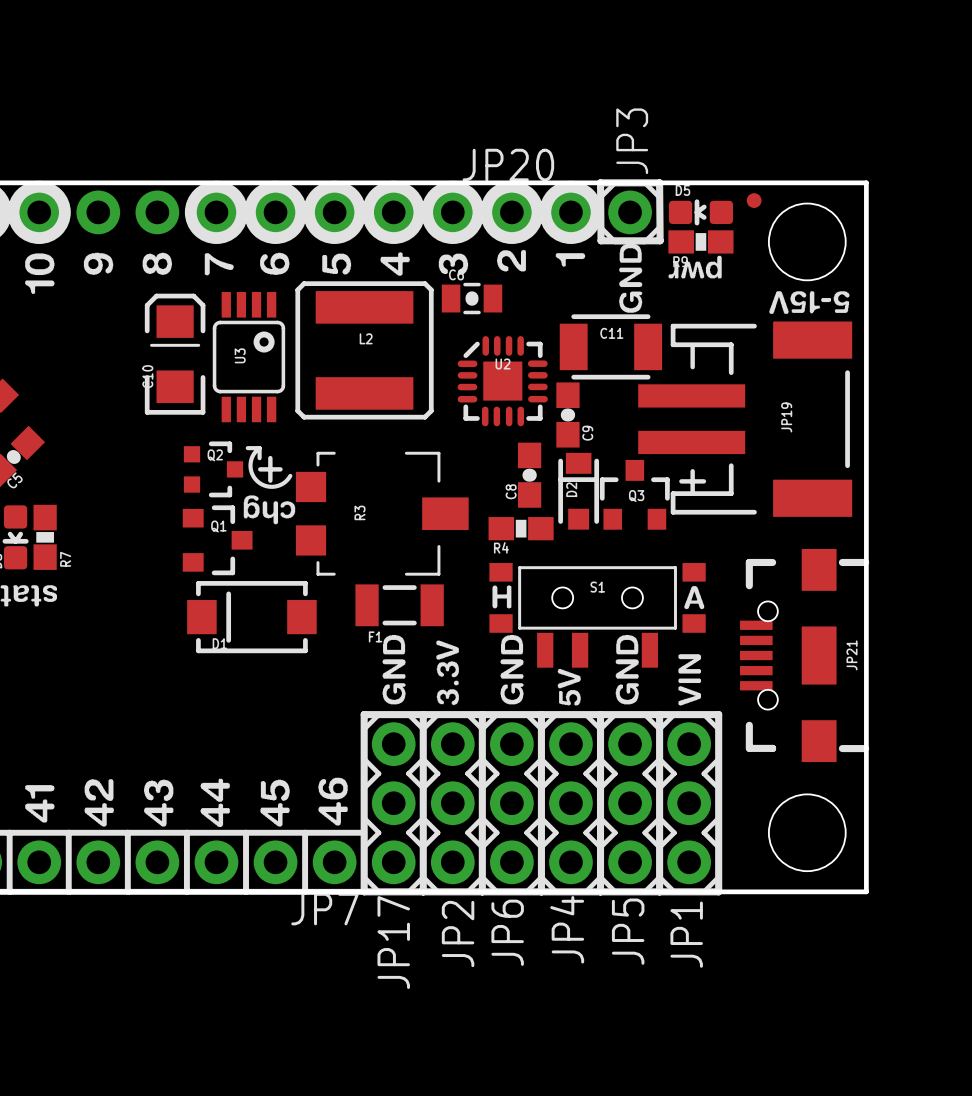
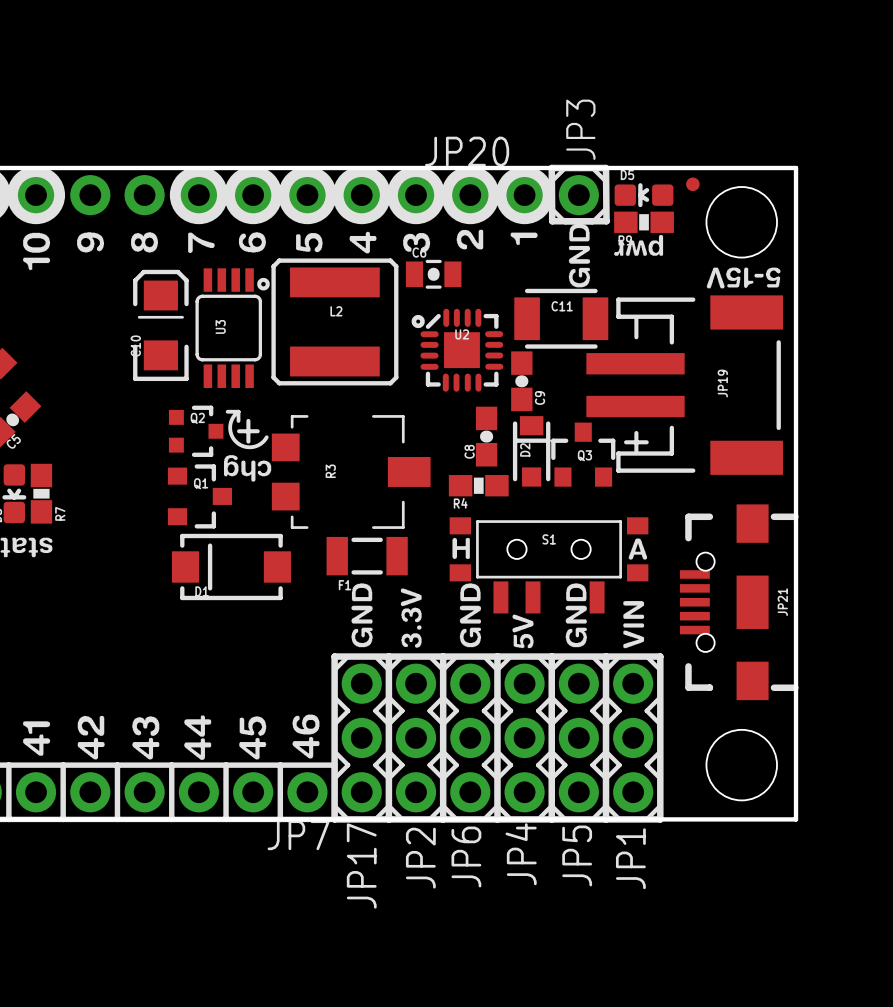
U3 footprint: [212, 292, 286, 423] -> [195, 268, 270, 388]
U2 footprint: [457, 336, 548, 427] -> [411, 308, 504, 392]

